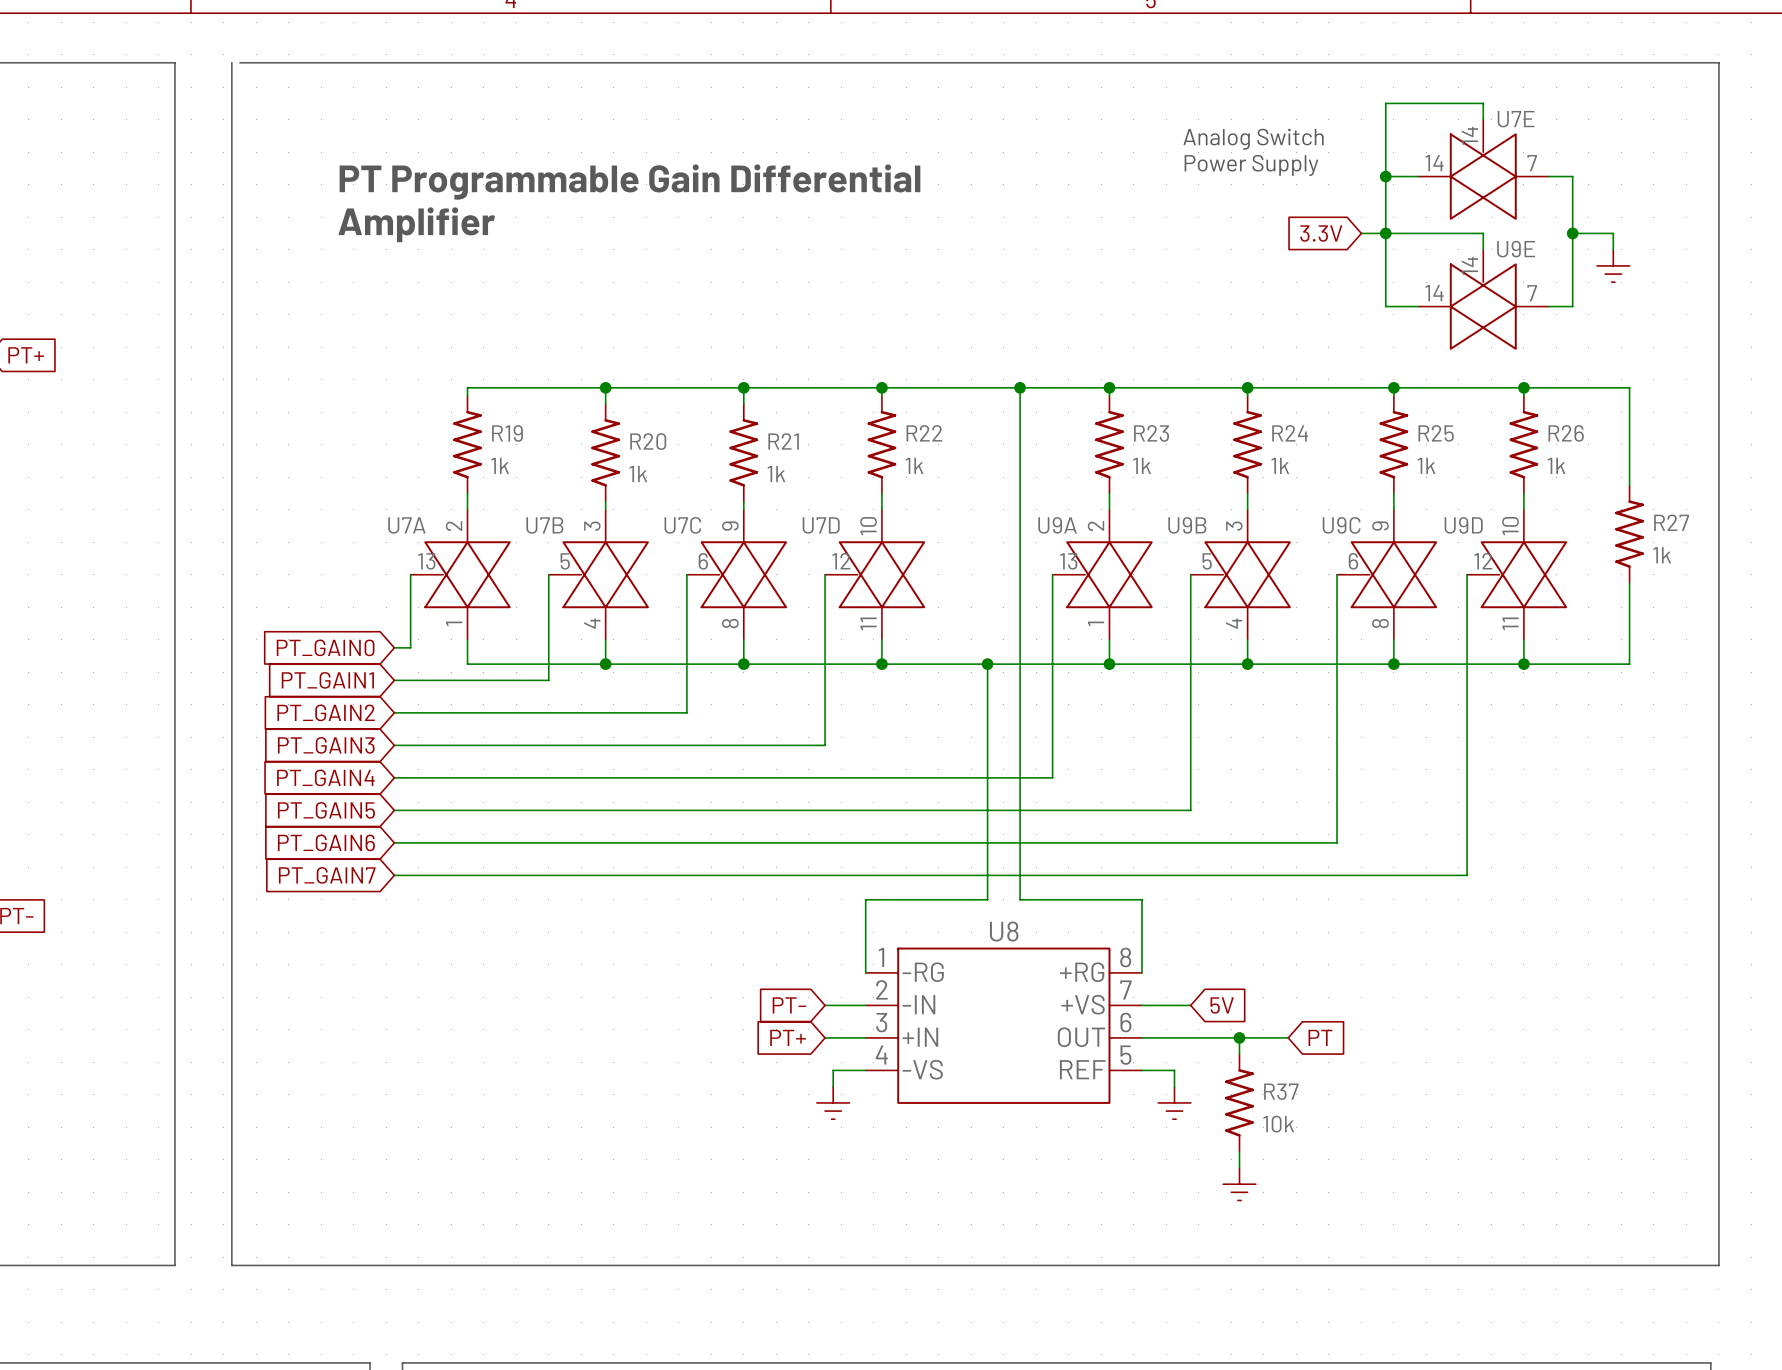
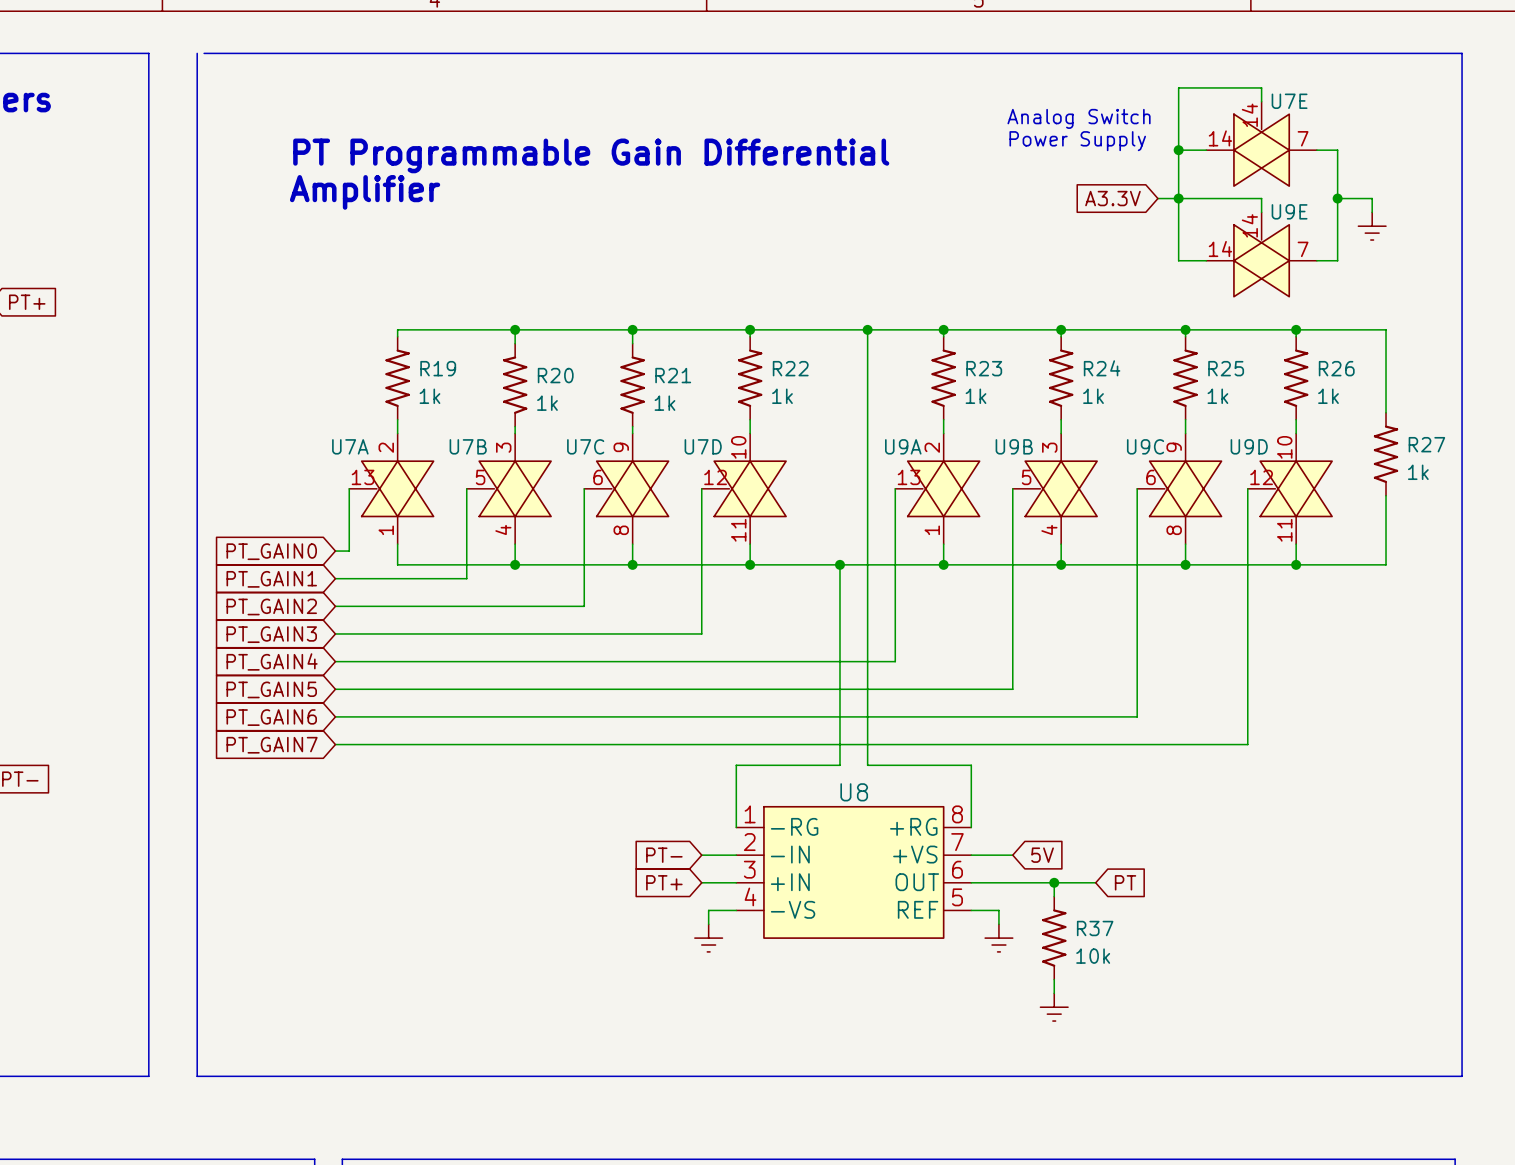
global label: 3.3V (1321, 233) -> A3.3V (1112, 198)
R20 flip: as is (605, 452) -> left-right (515, 385)

